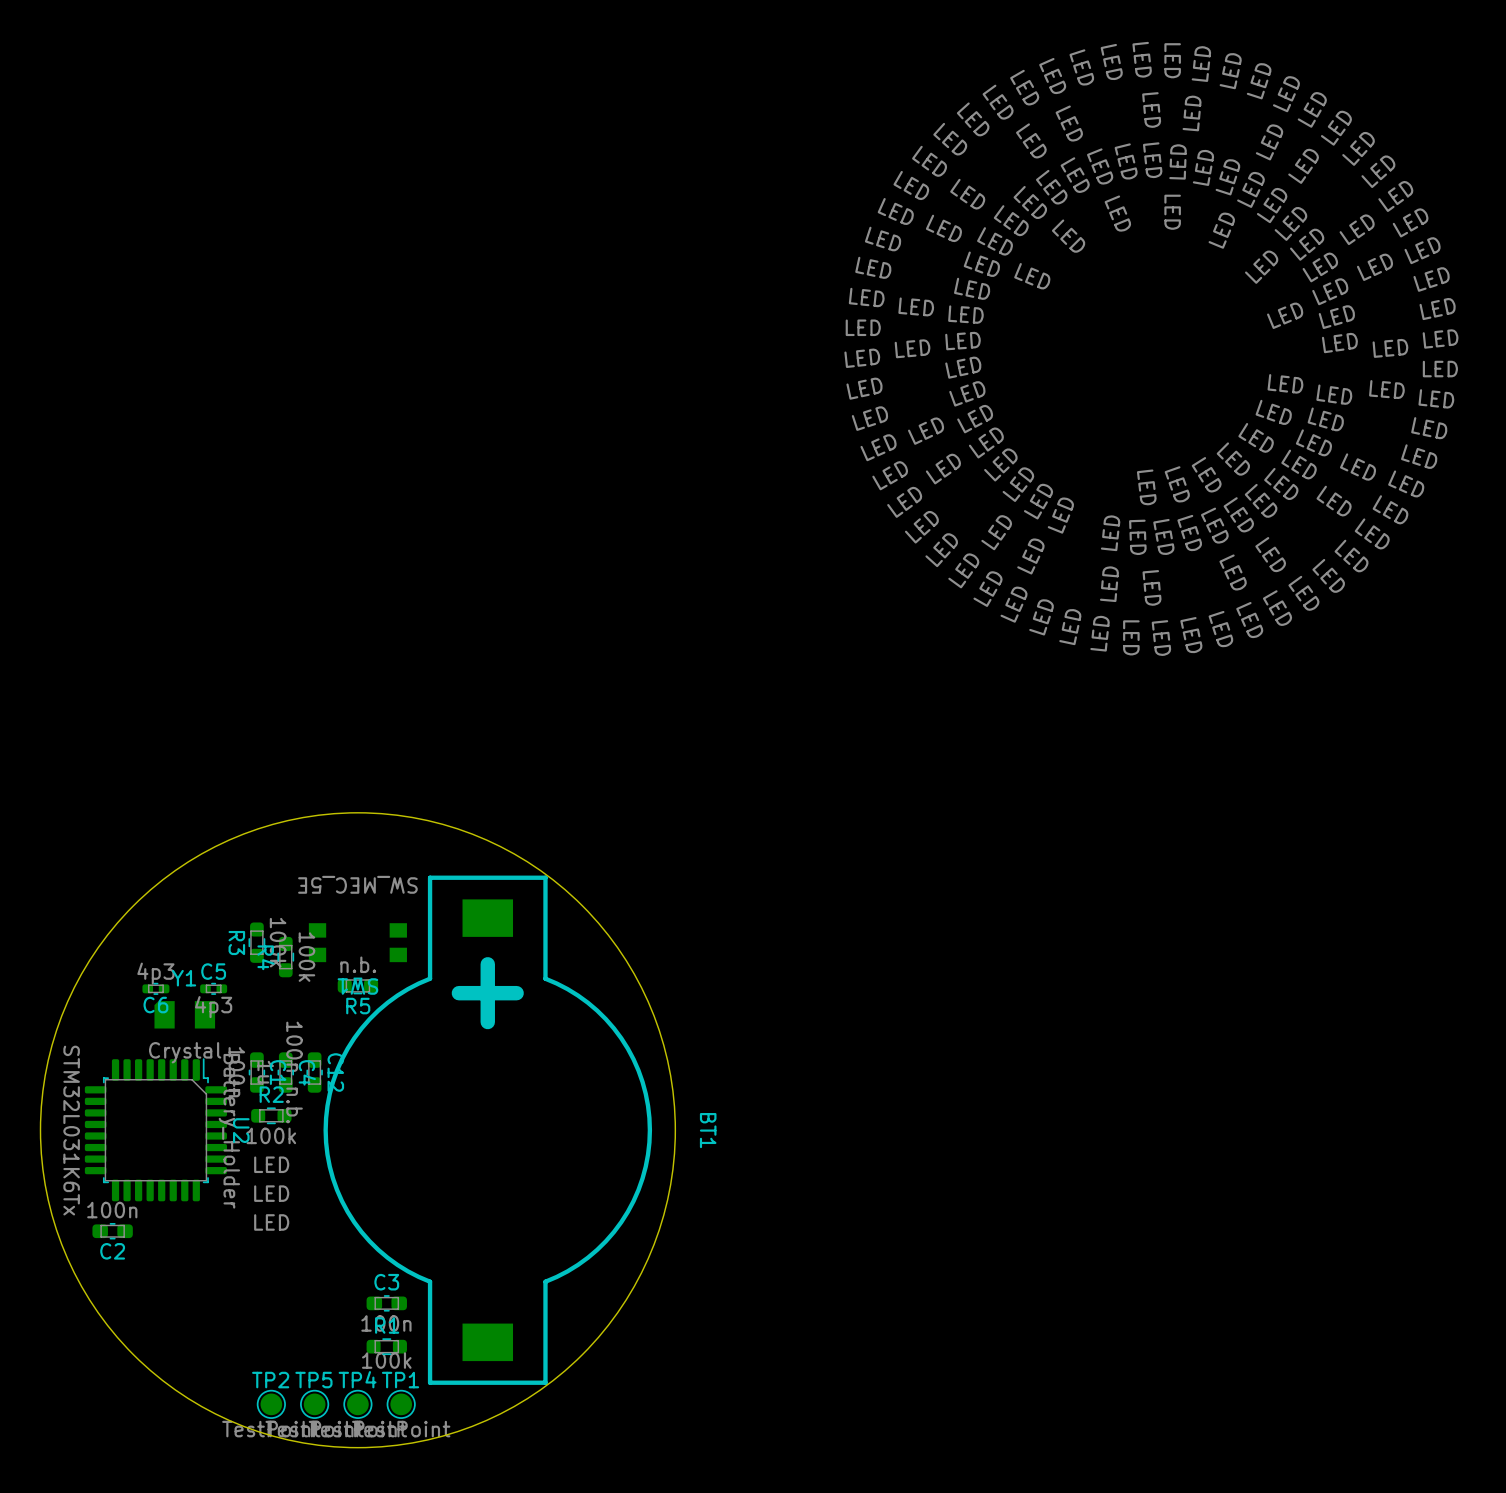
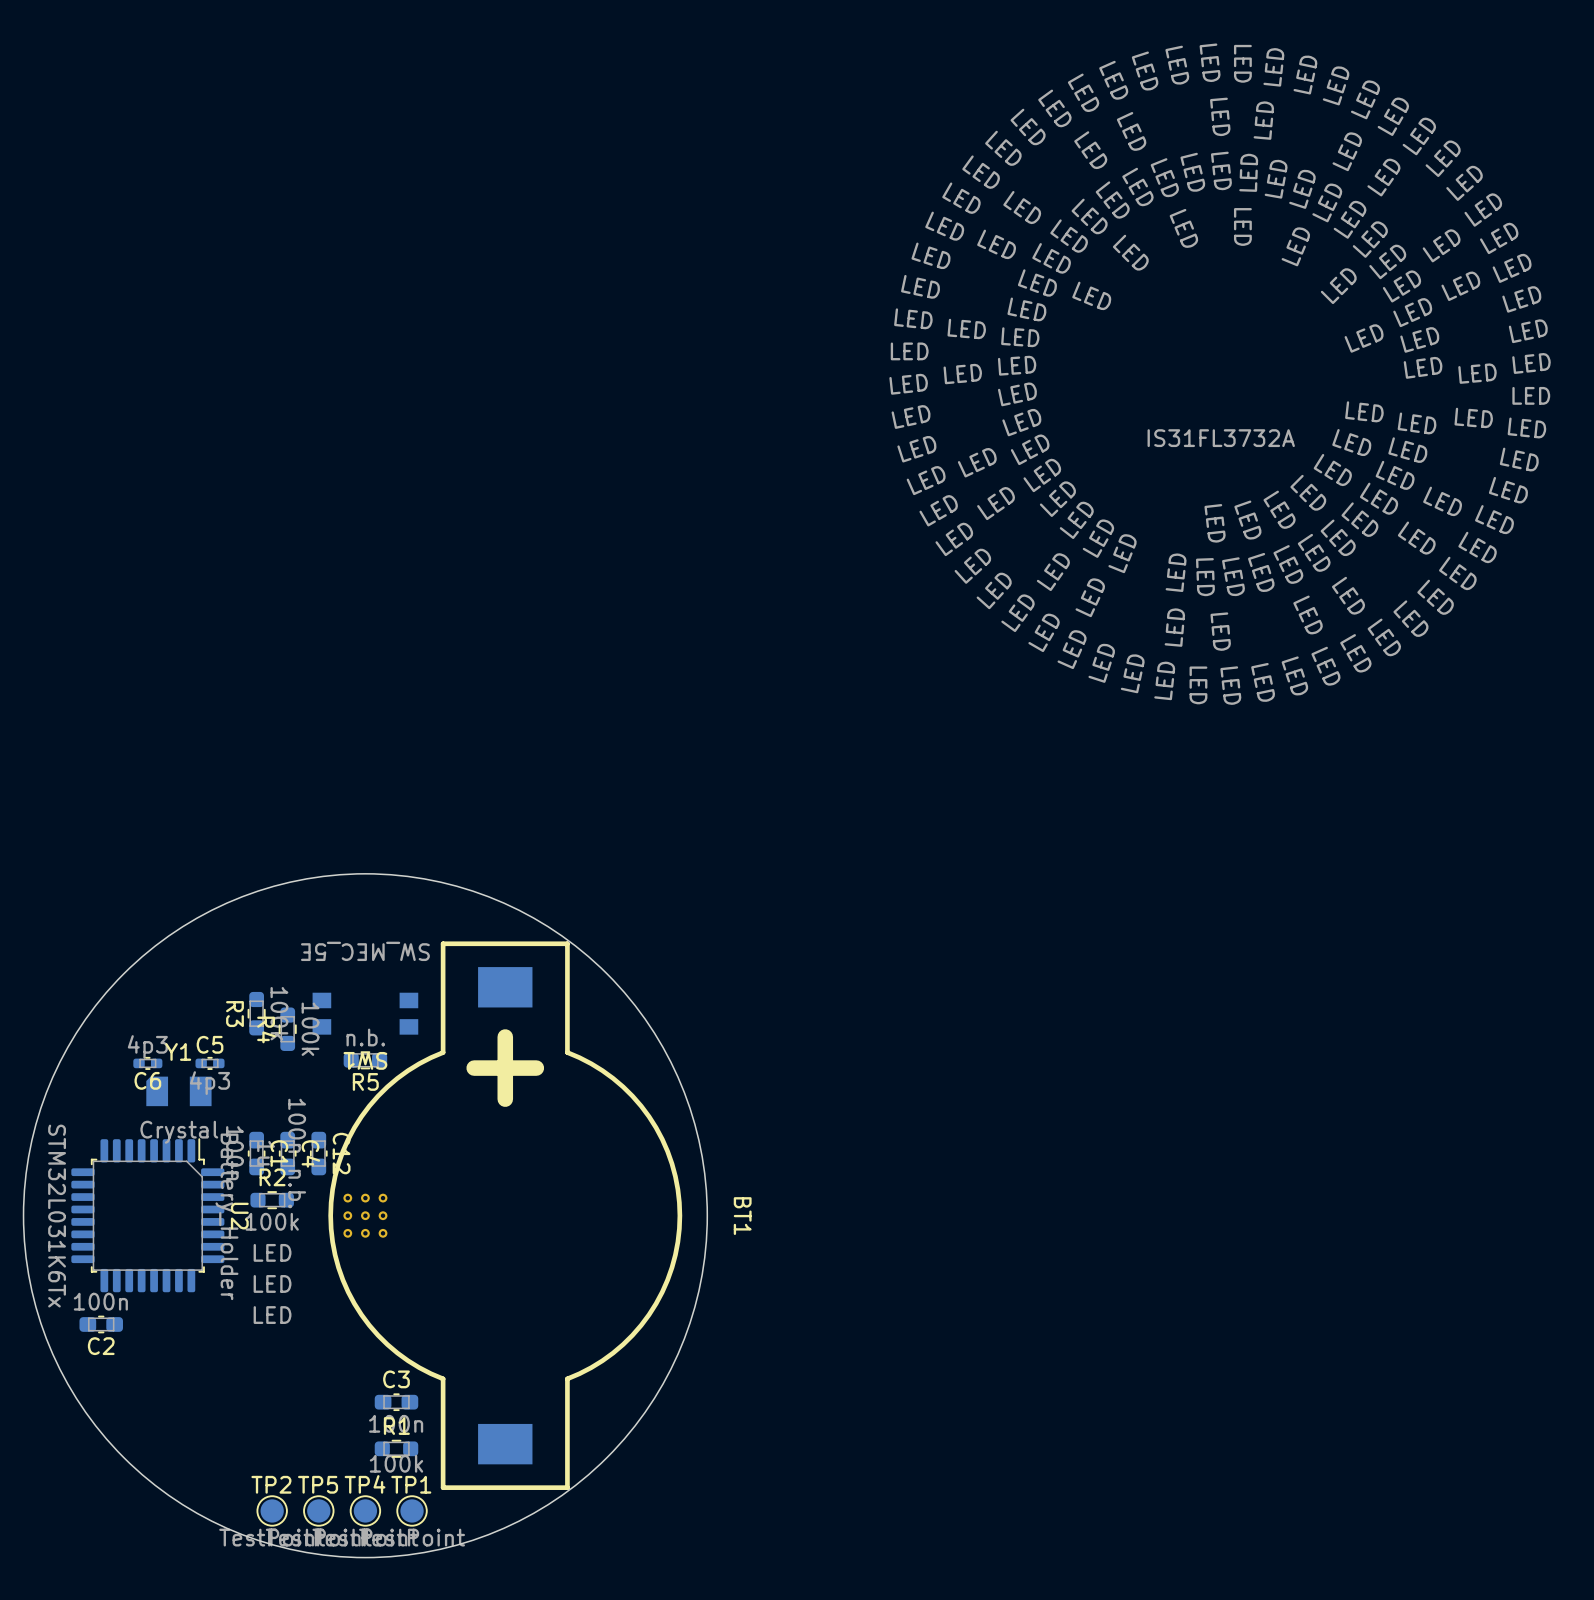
part: none -> IS31FL3732A (365, 1215)

